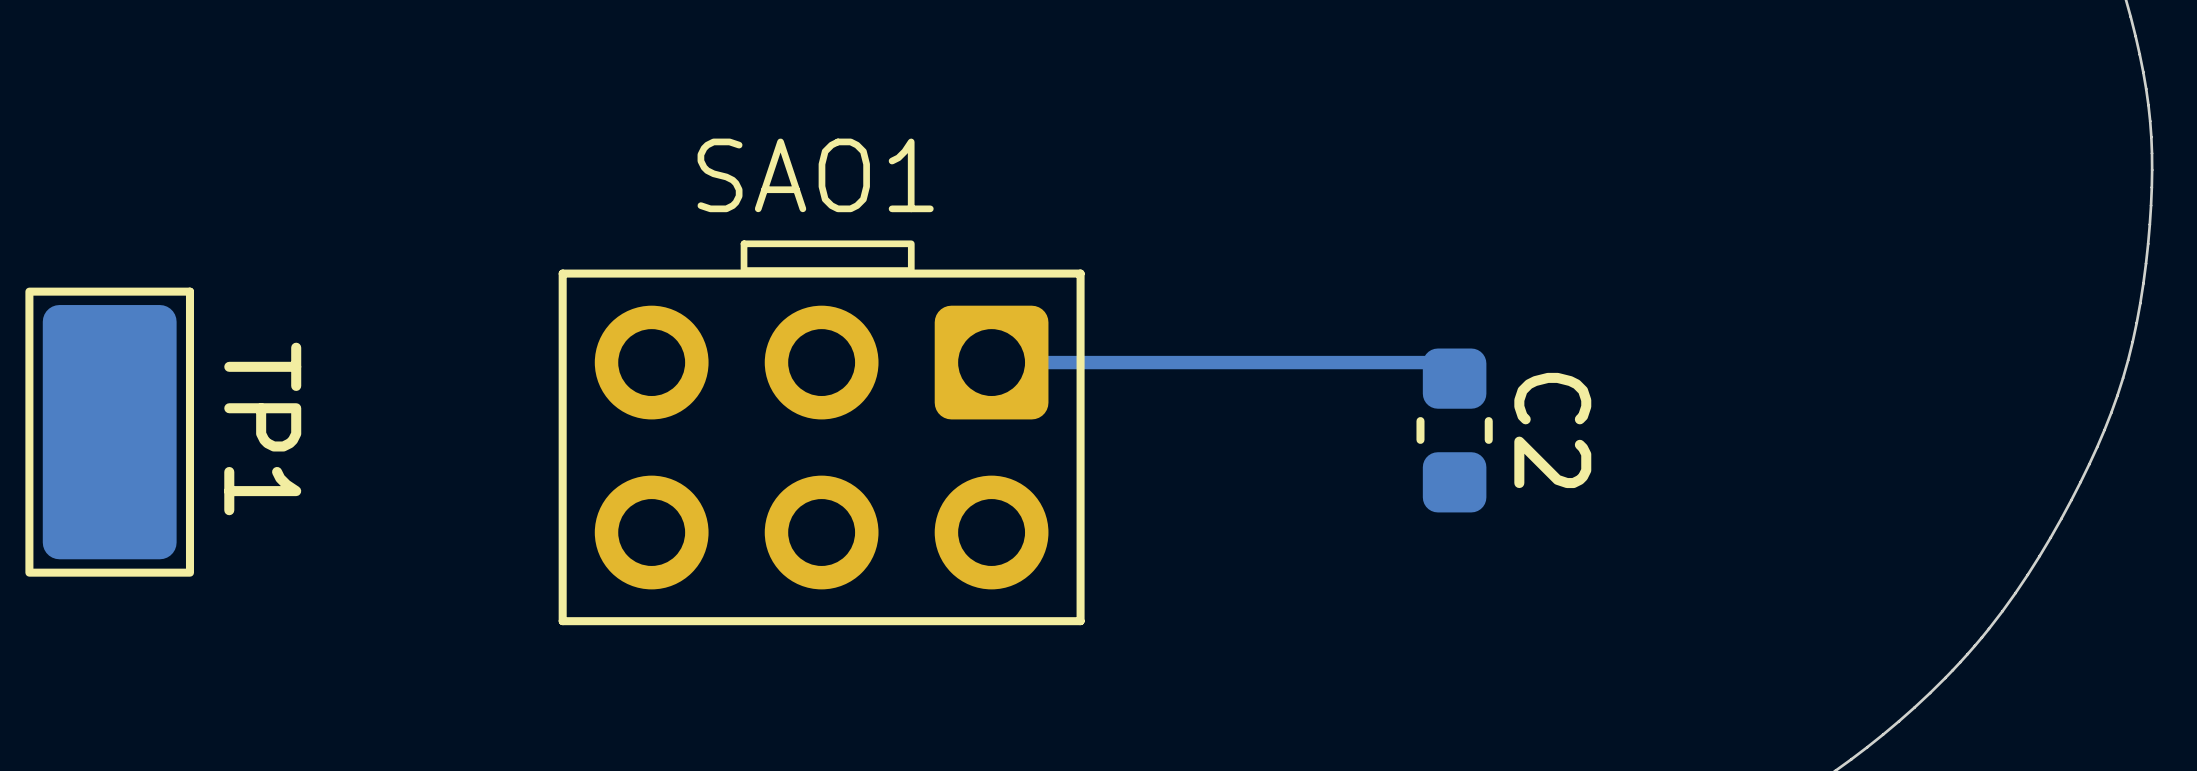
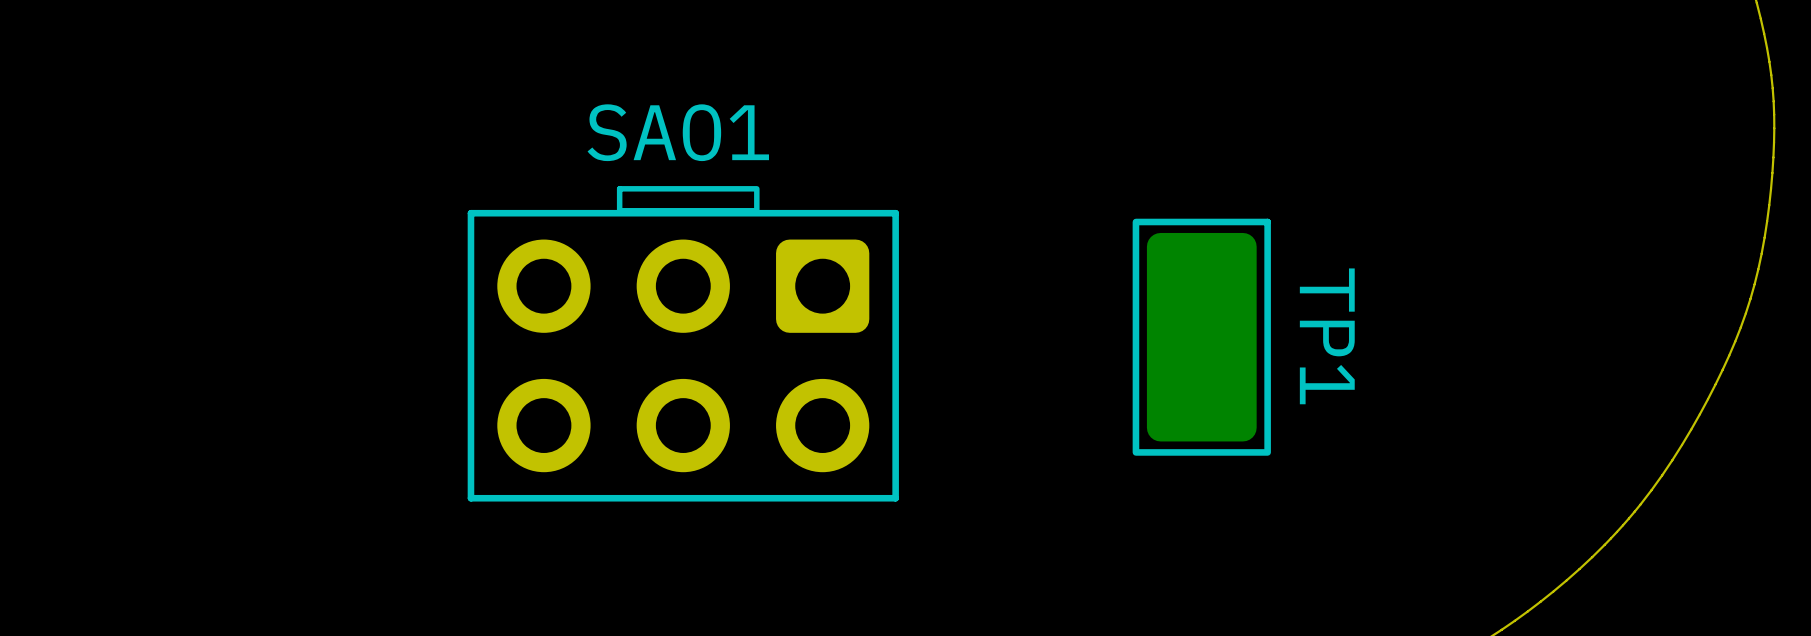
bottom track: (991, 362) (1438, 362) (1454, 378) -> none
C2: (1454, 430) -> none
TP1 position: (109, 432) -> (1201, 337)

